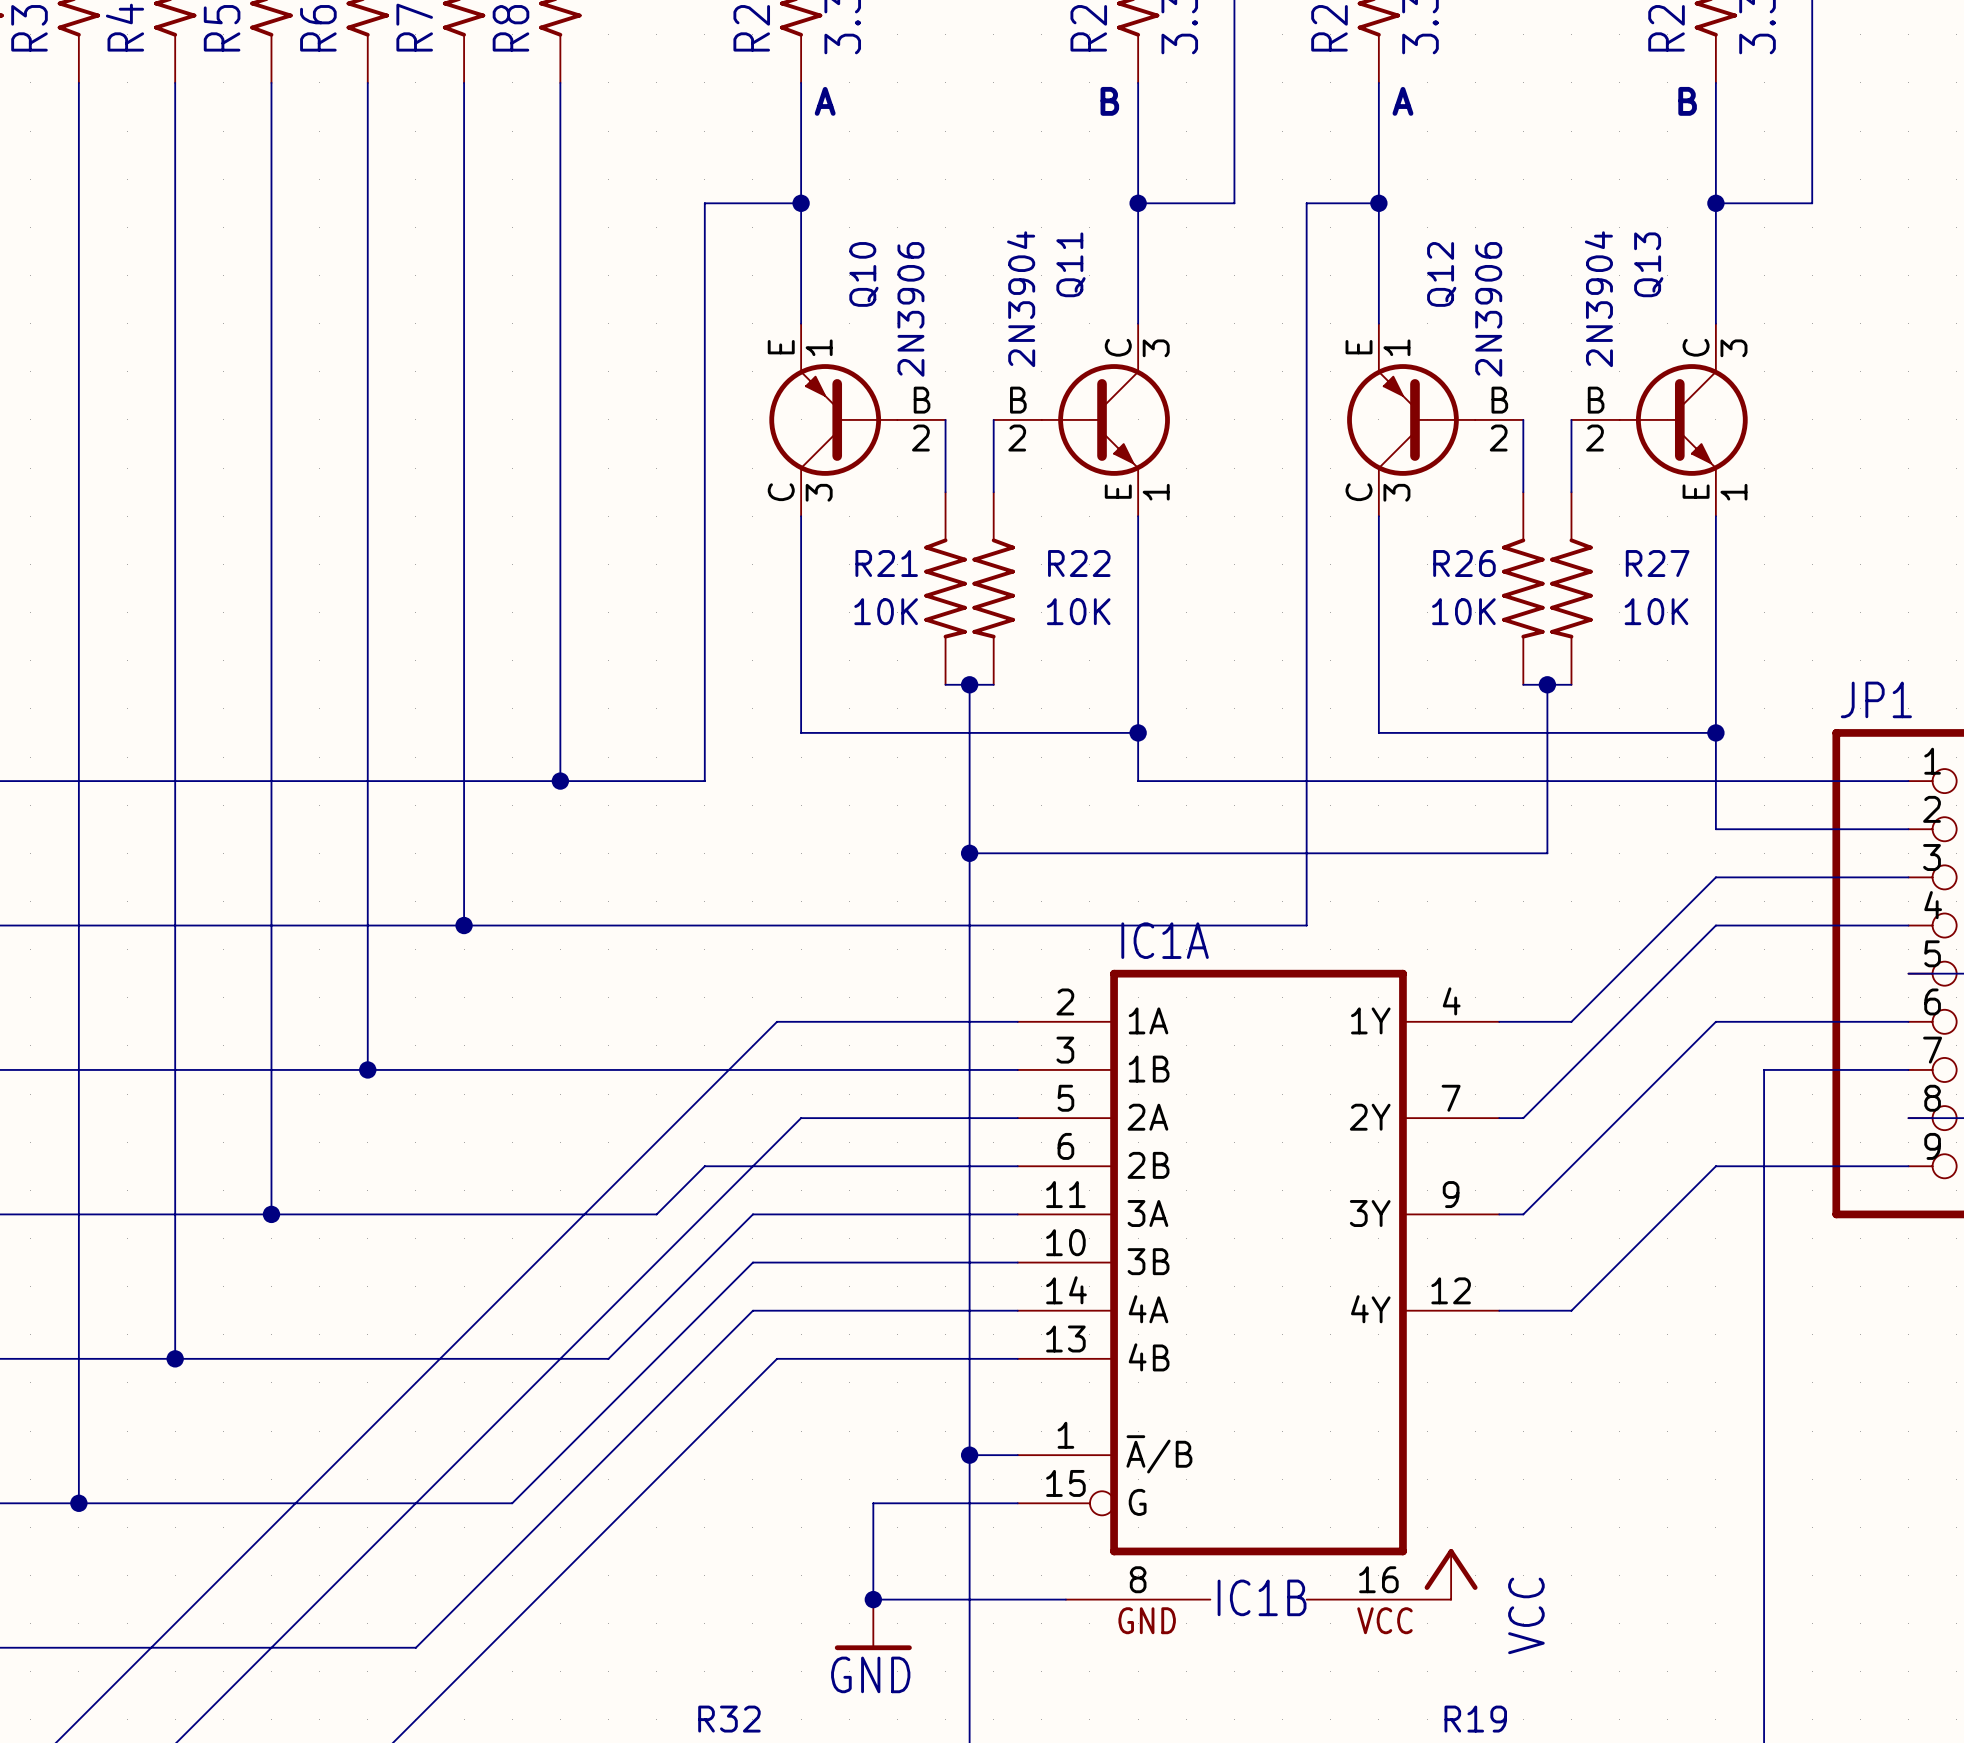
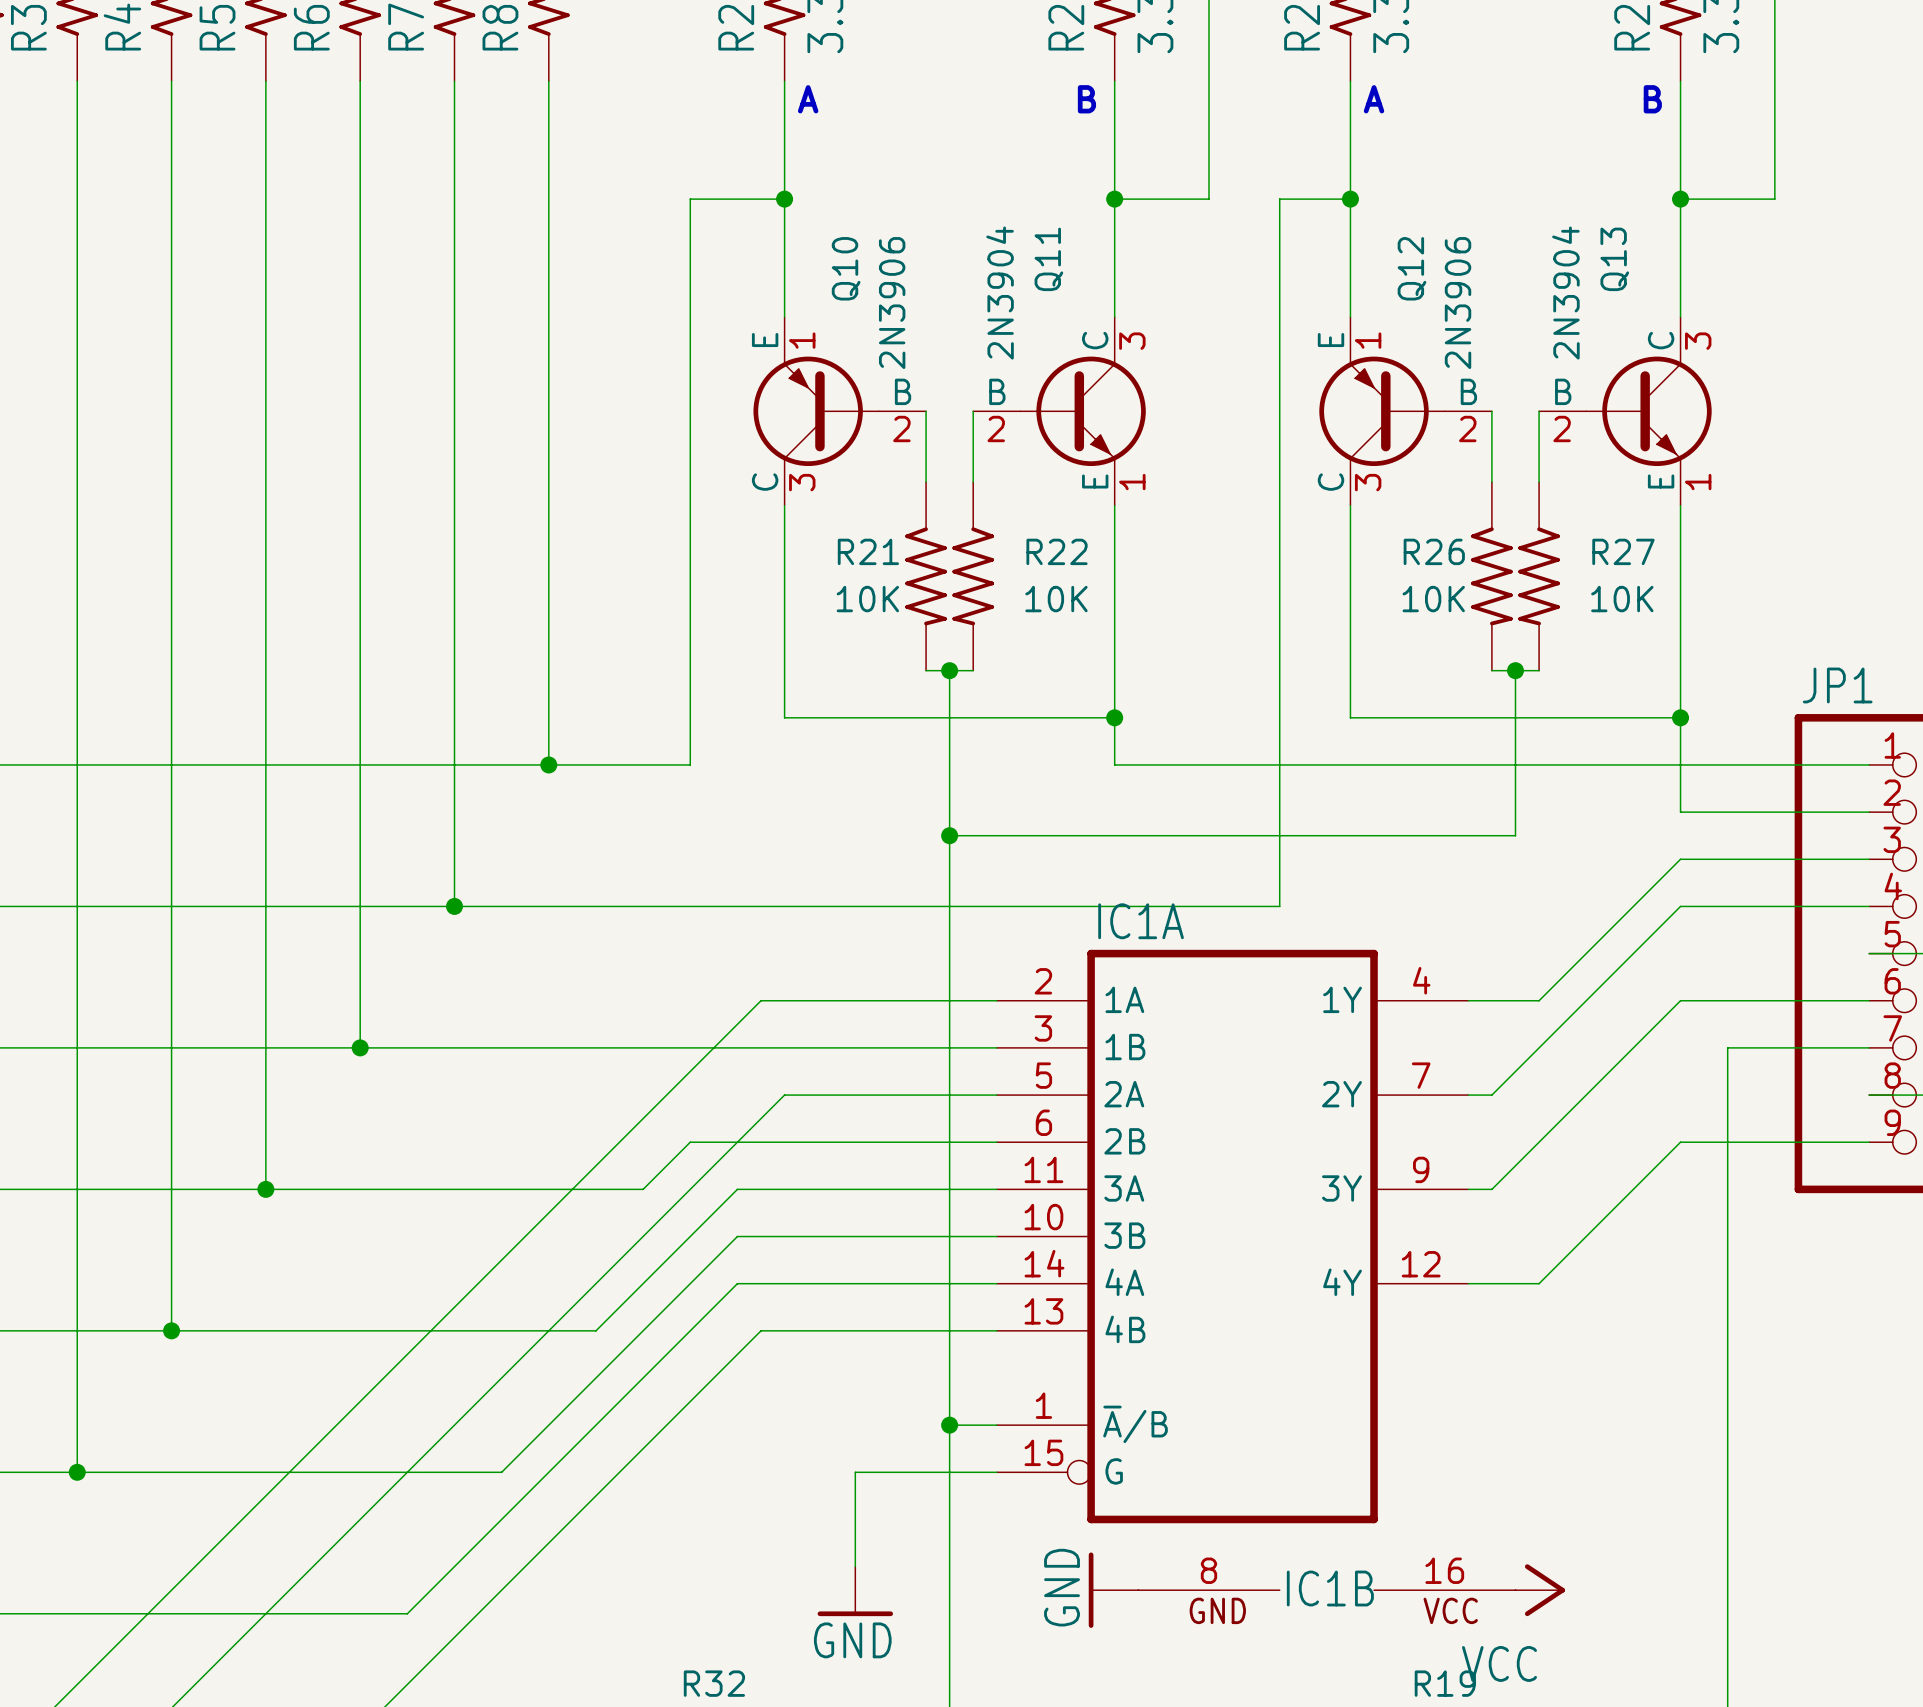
power symbol rotation: 0° (1451, 1569) -> 90° clockwise (1544, 1590)
power symbol position: VCC (1451, 1574) -> VCC (1540, 1590)
wire: (873, 1599) (1065, 1599) -> none
junction: (873, 1599) -> none
IC1B position: (1258, 1599) -> (1326, 1590)
power symbol: none -> GND (1113, 1590)

